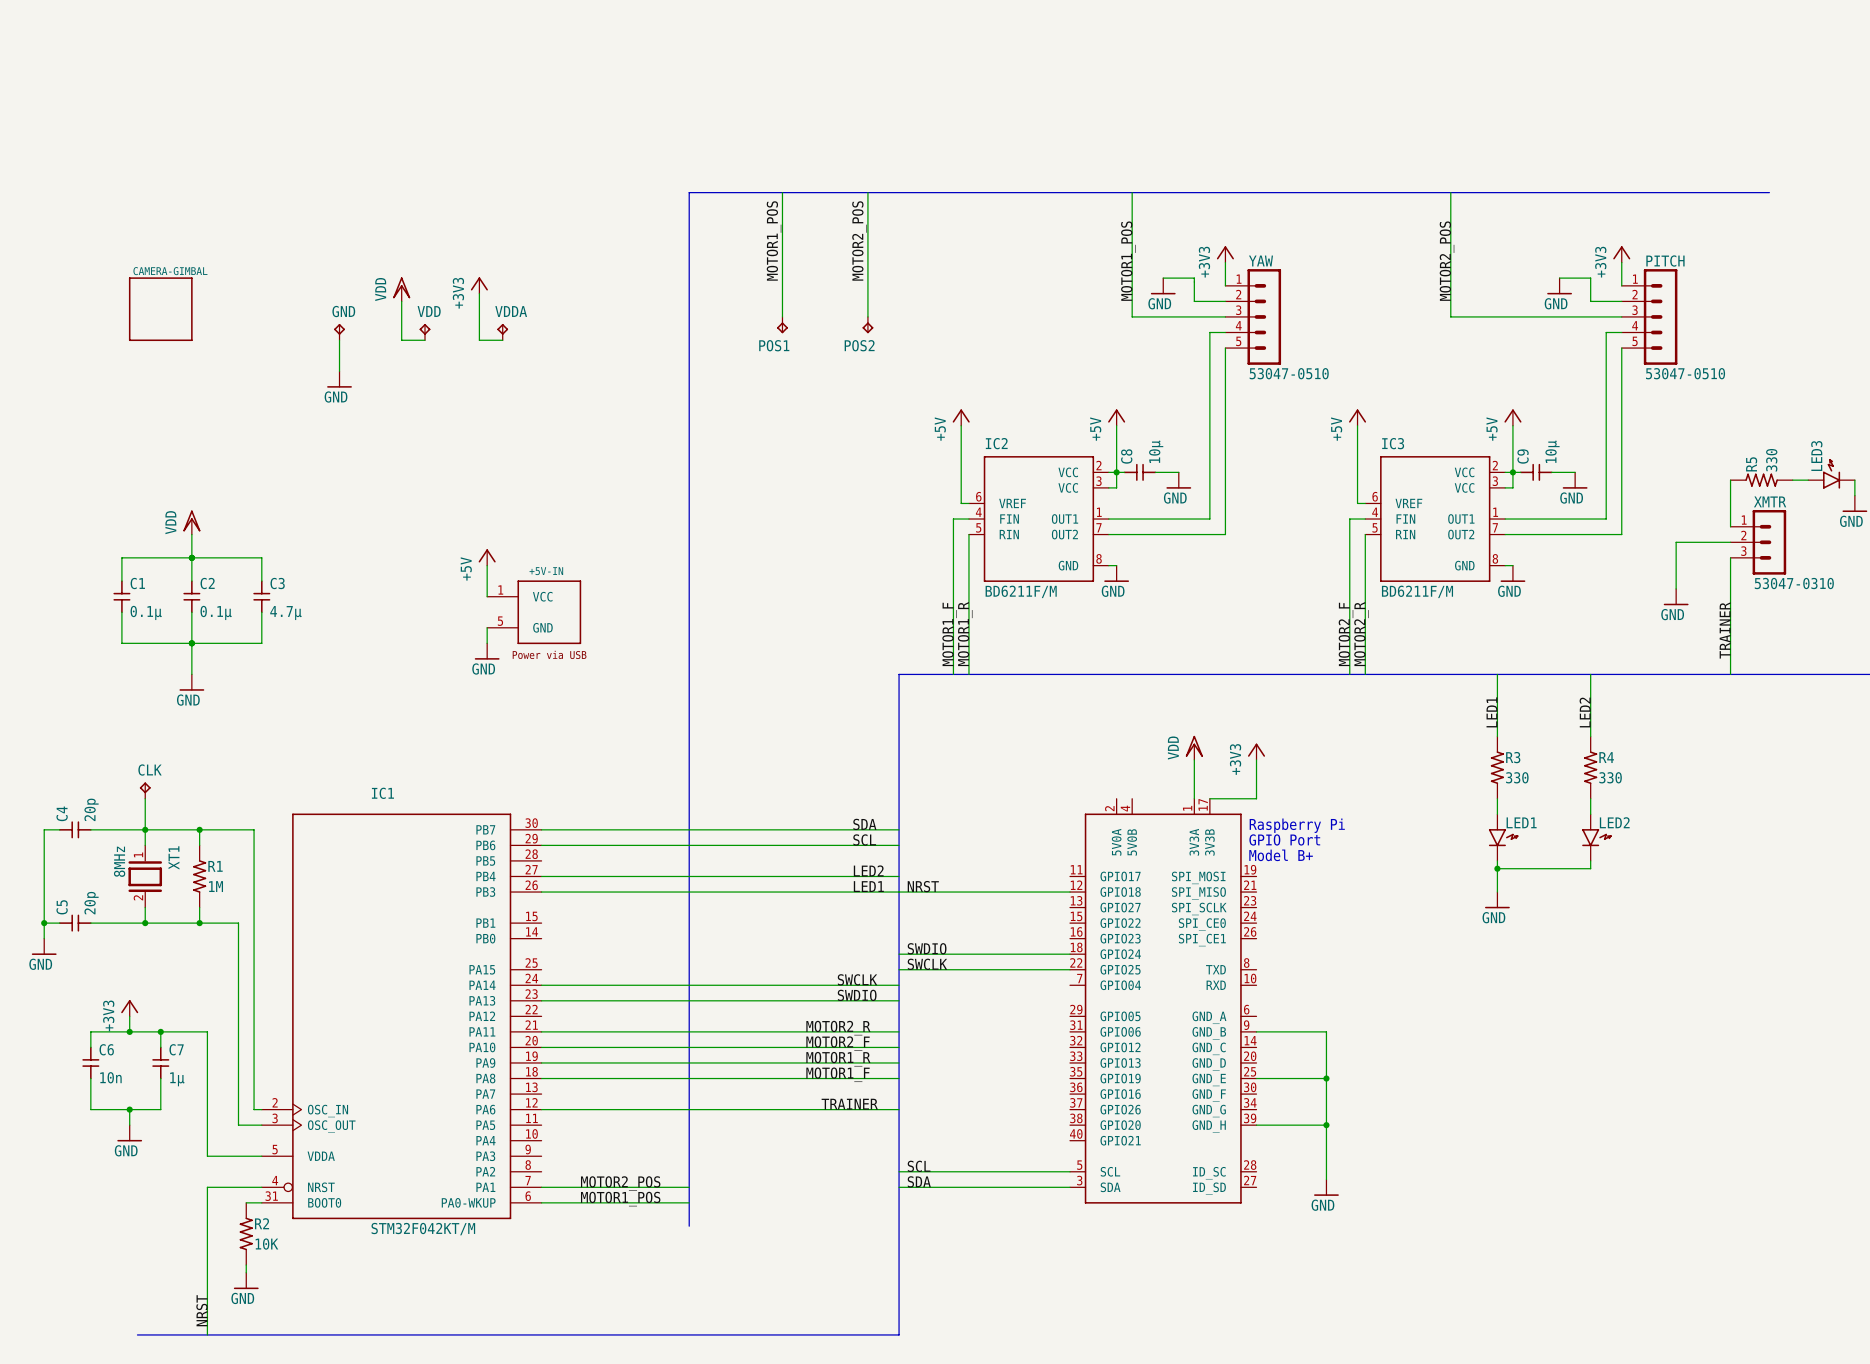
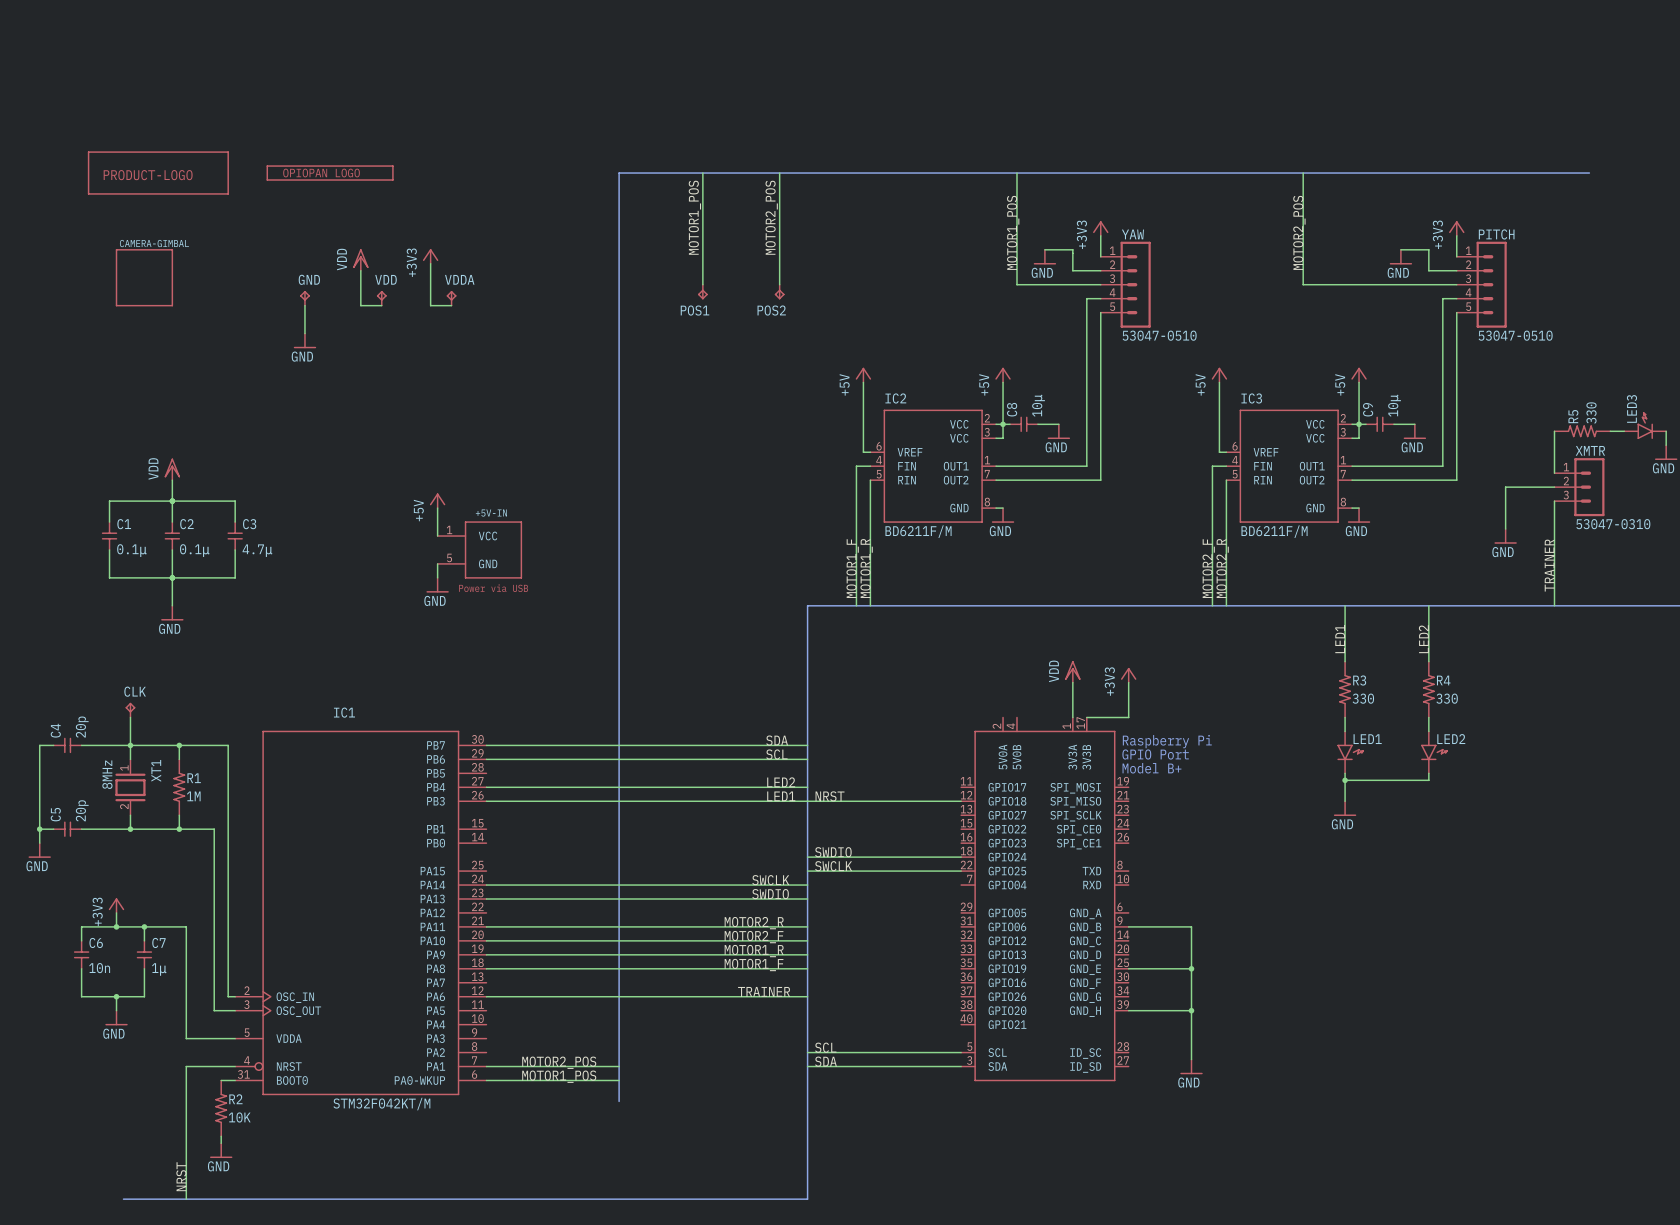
part: none -> (158, 173)
part: none -> (330, 173)

